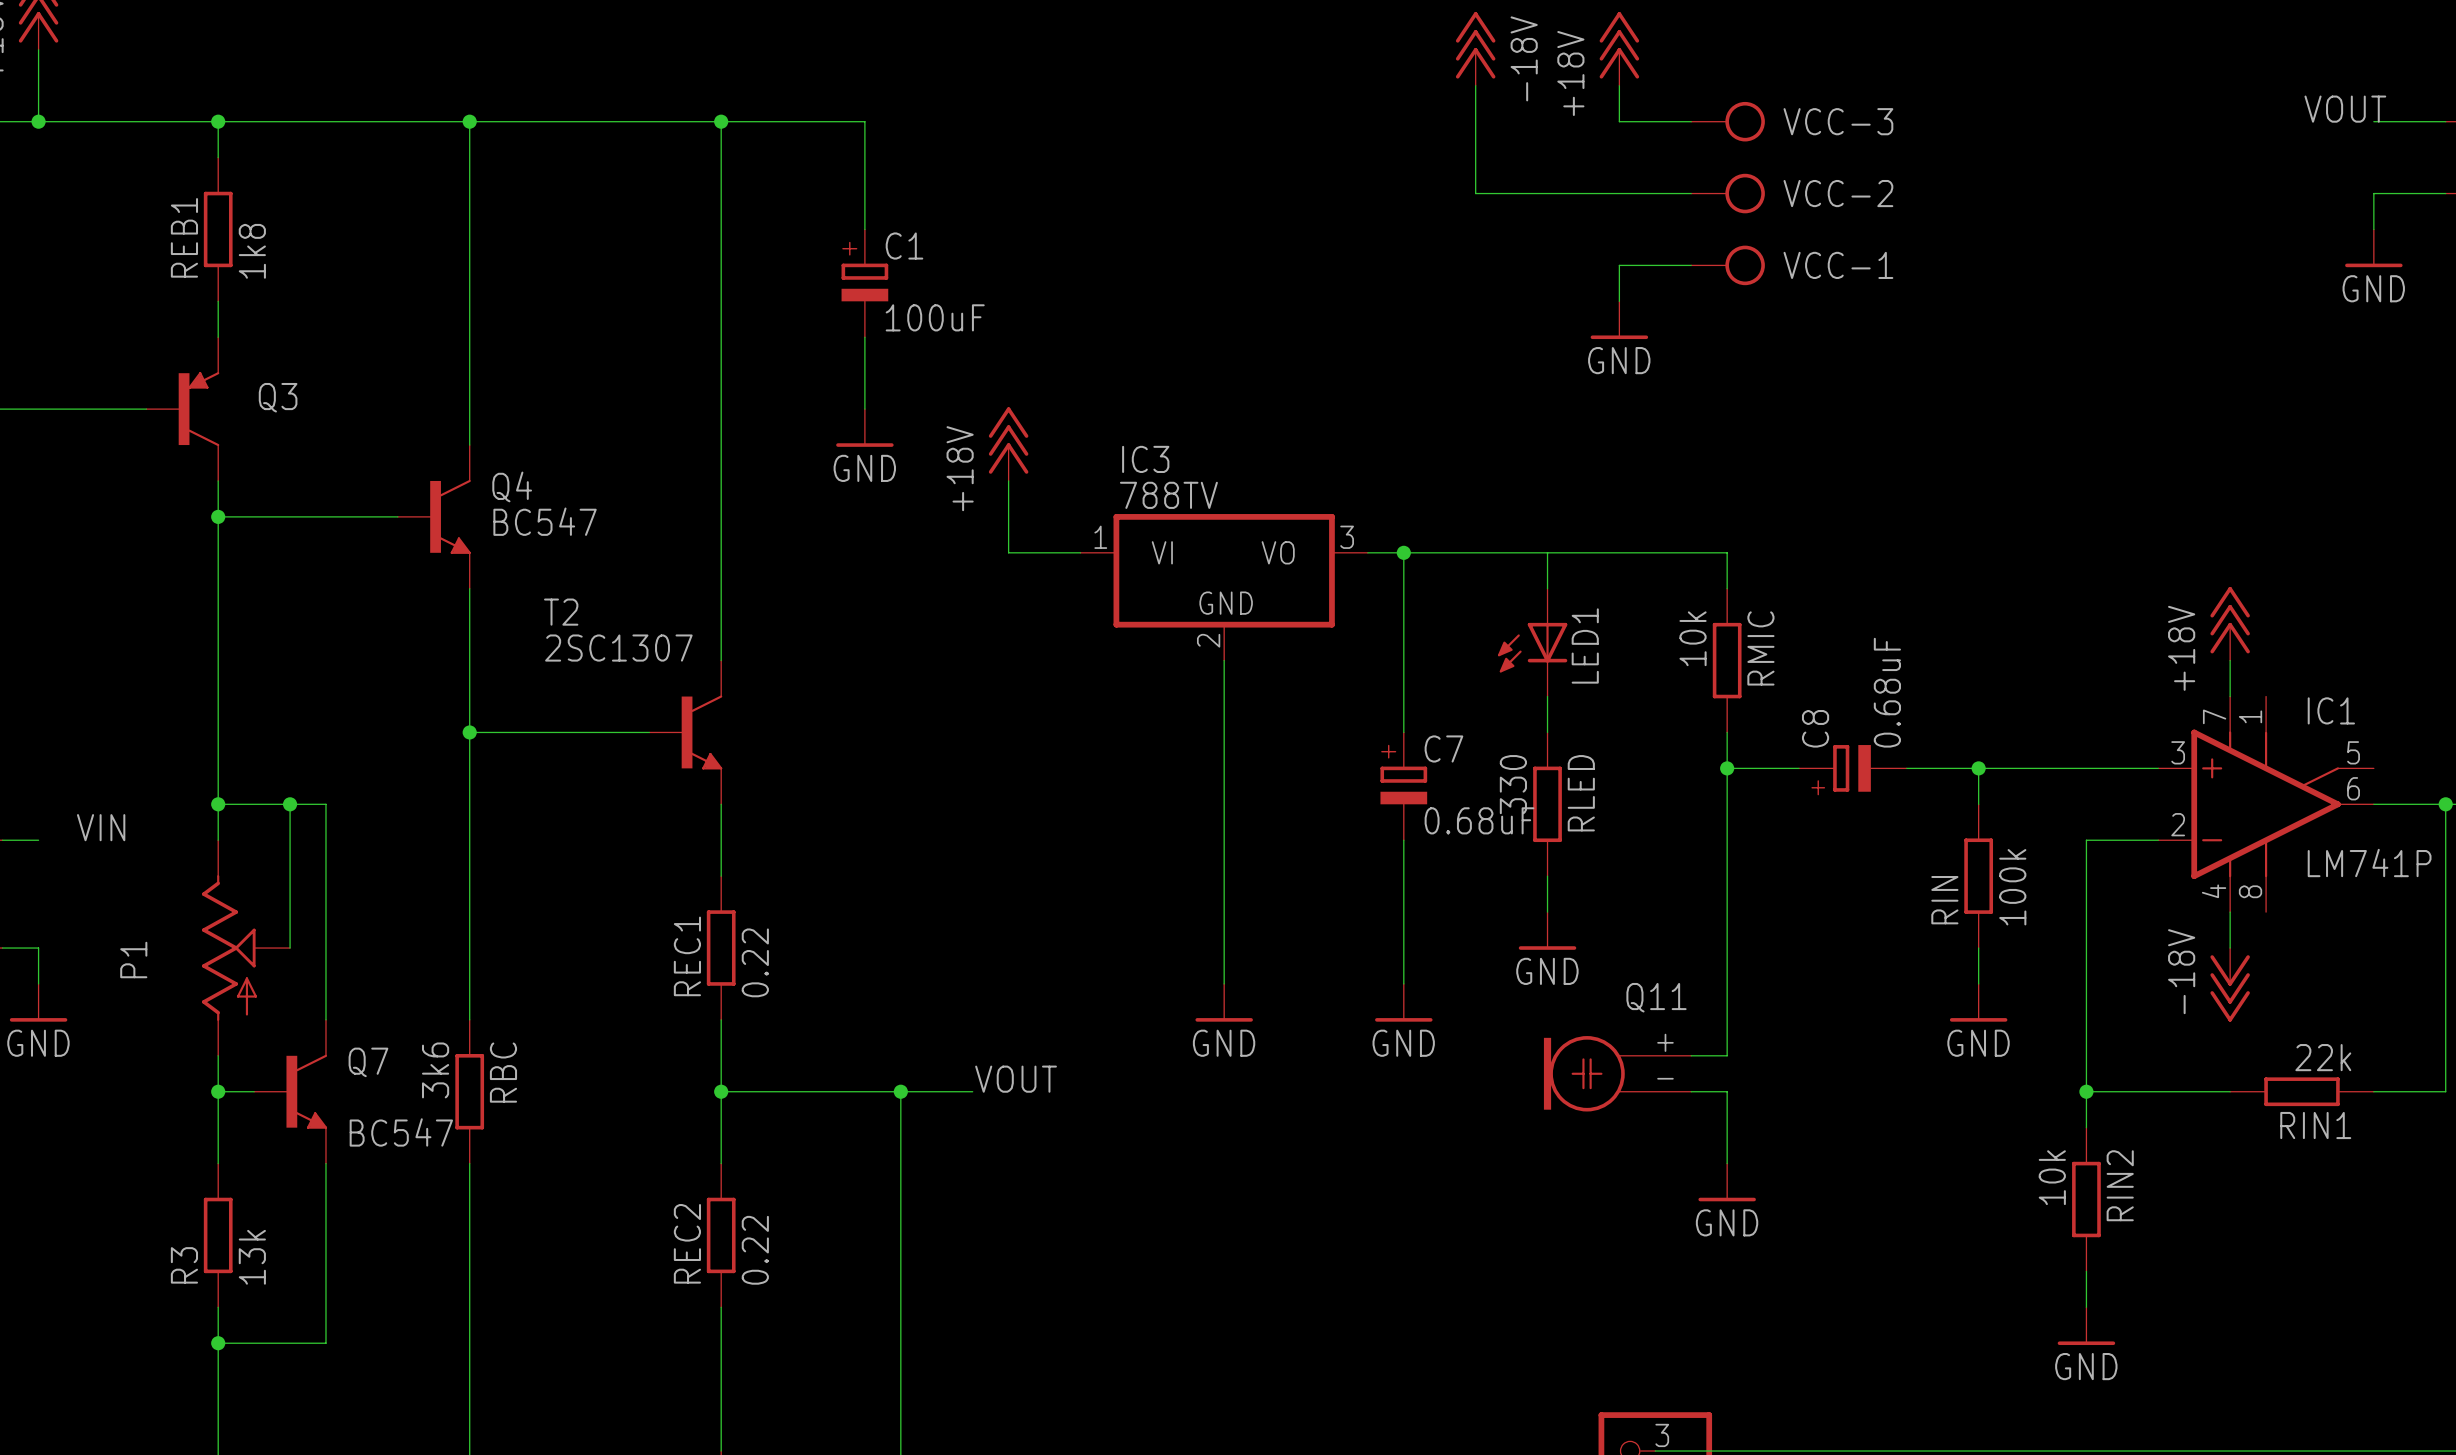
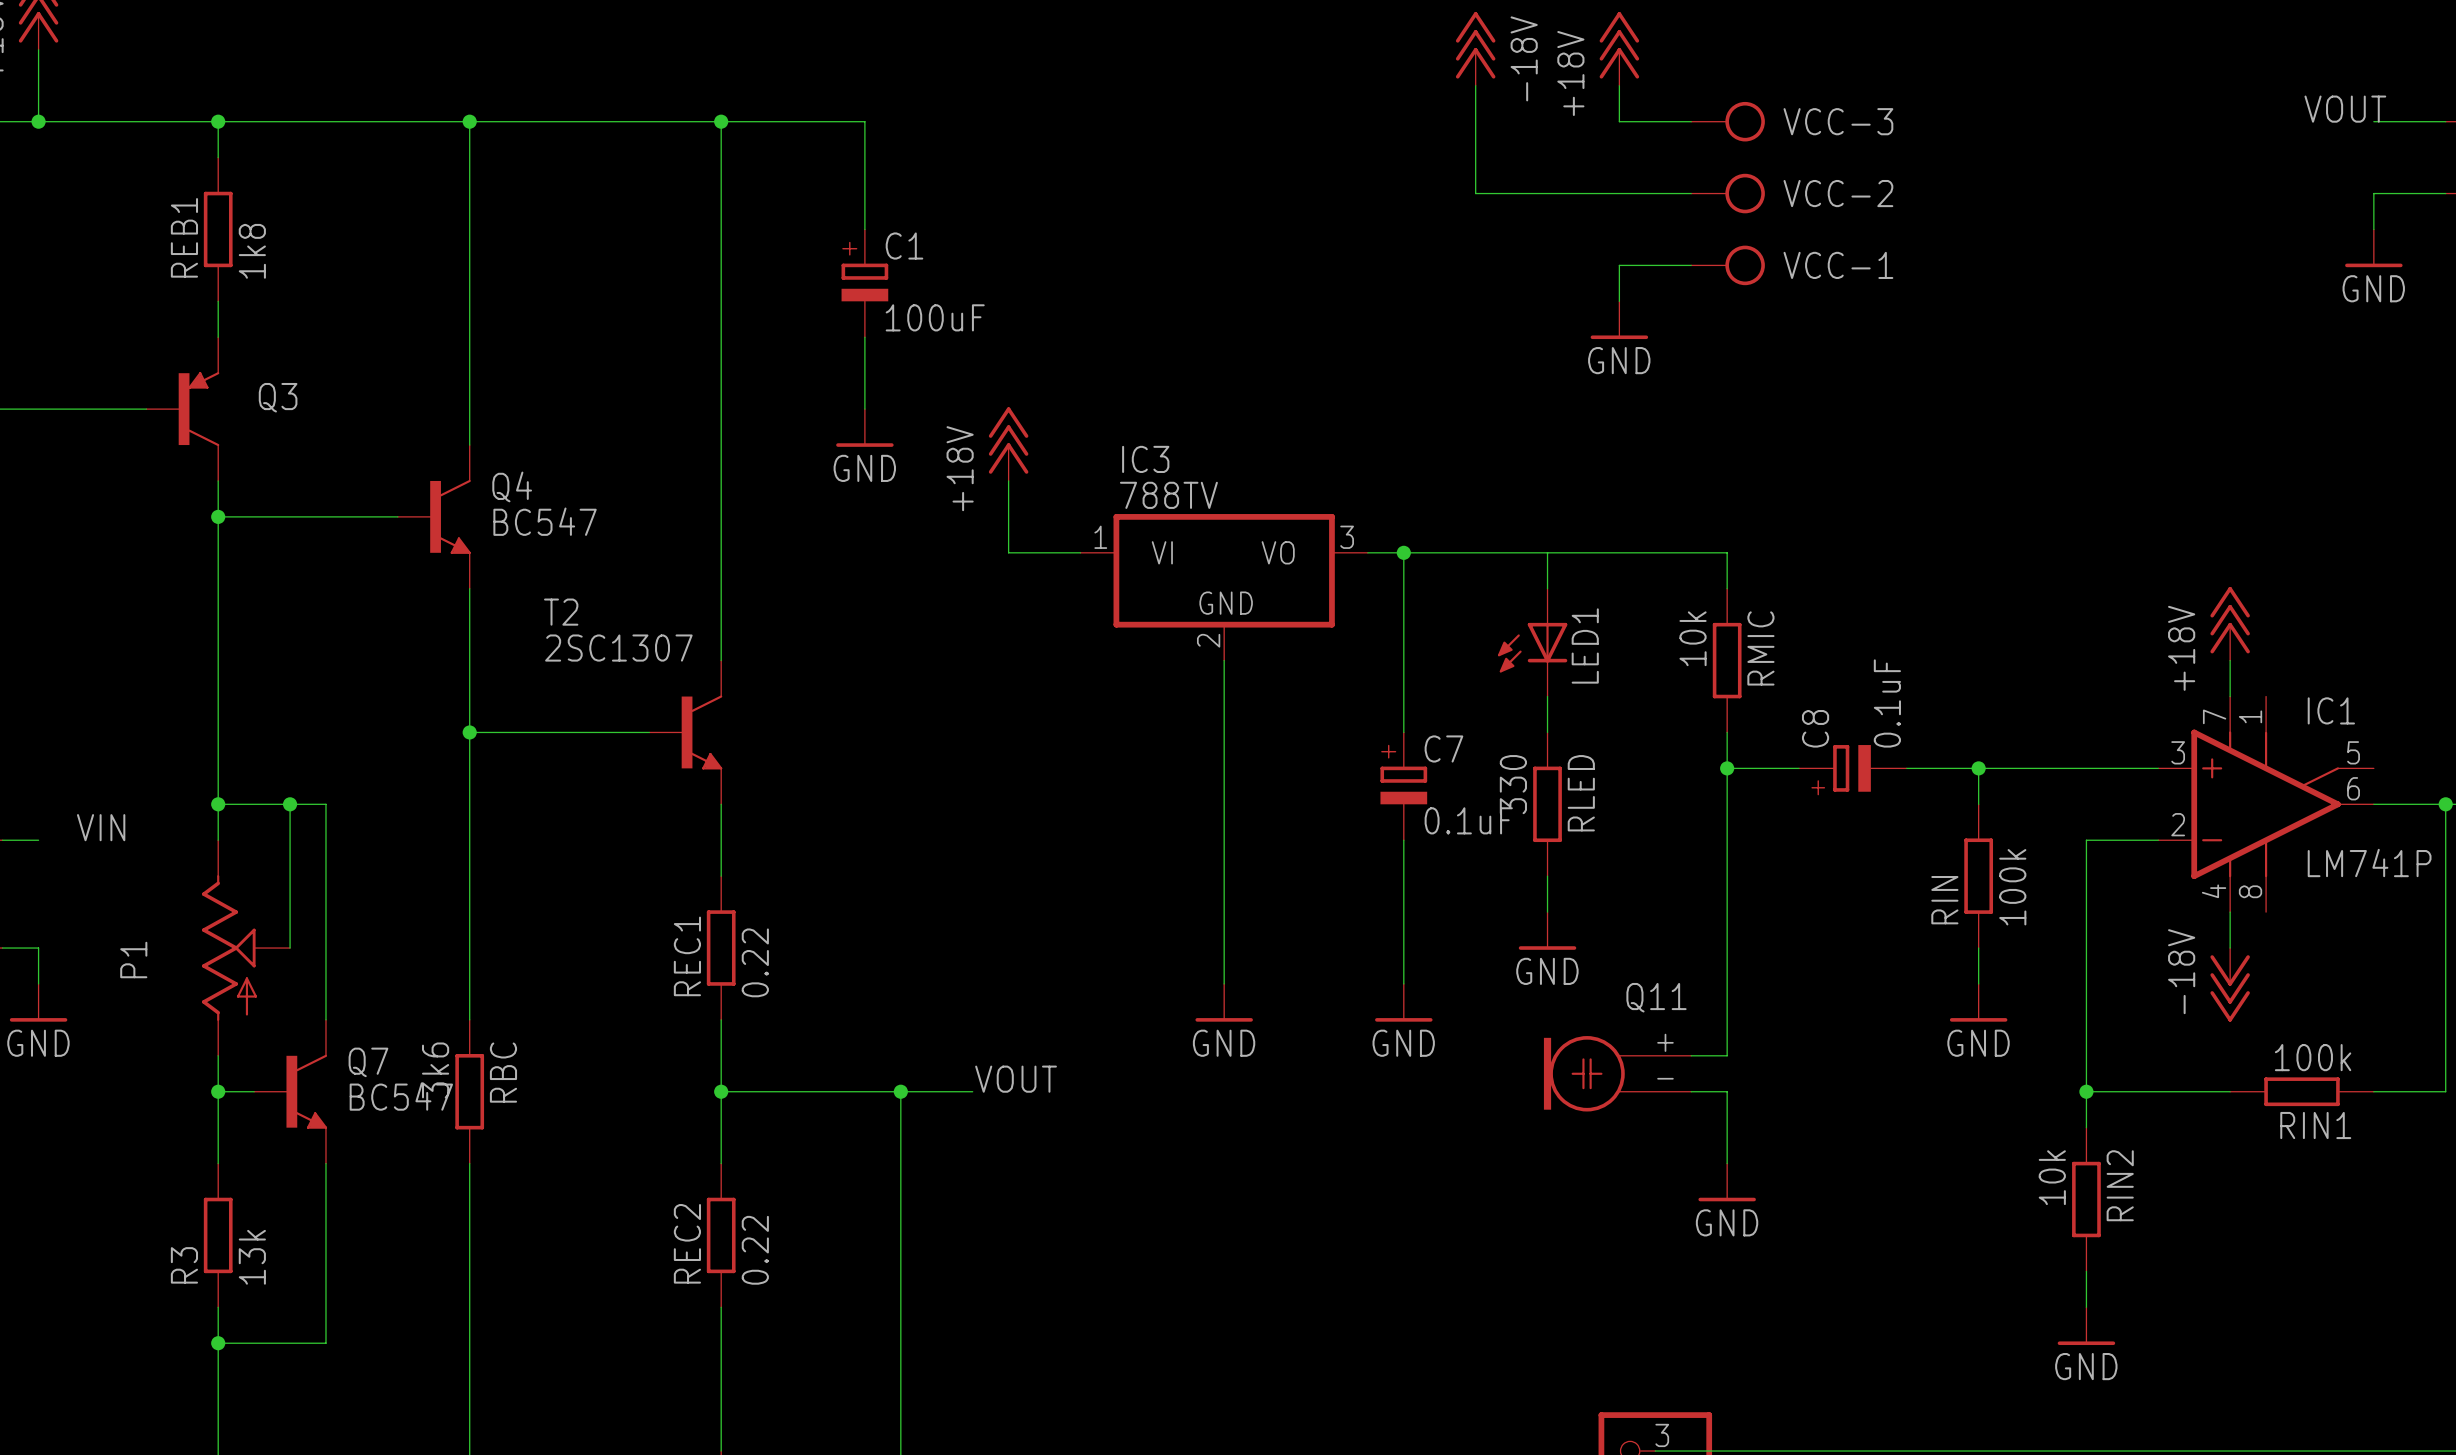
C8 value: 0.68uF (1887, 692) -> 0.1uF (1887, 703)
C7 value: 0.68uF (1479, 820) -> 0.1uF (1468, 820)
RIN1 value: 22k (2323, 1057) -> 100k (2313, 1057)
Q7 value position: BC547 (401, 1132) -> BC547 (401, 1096)

